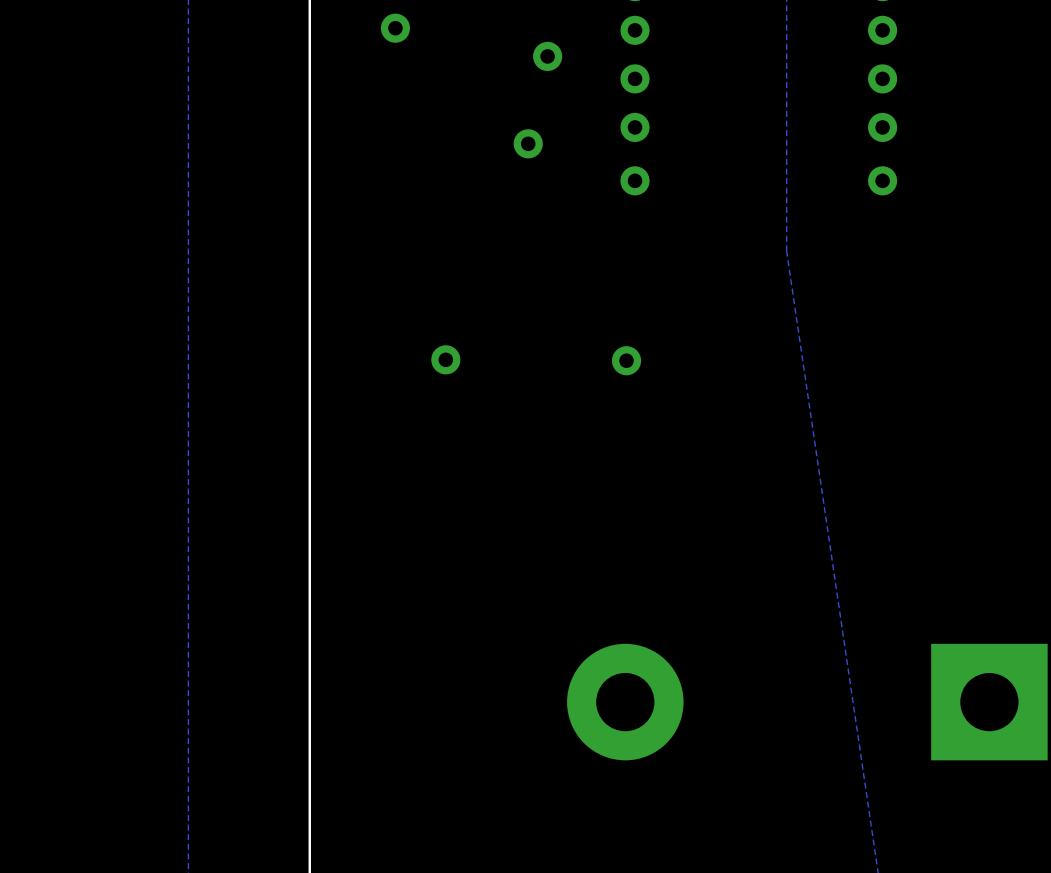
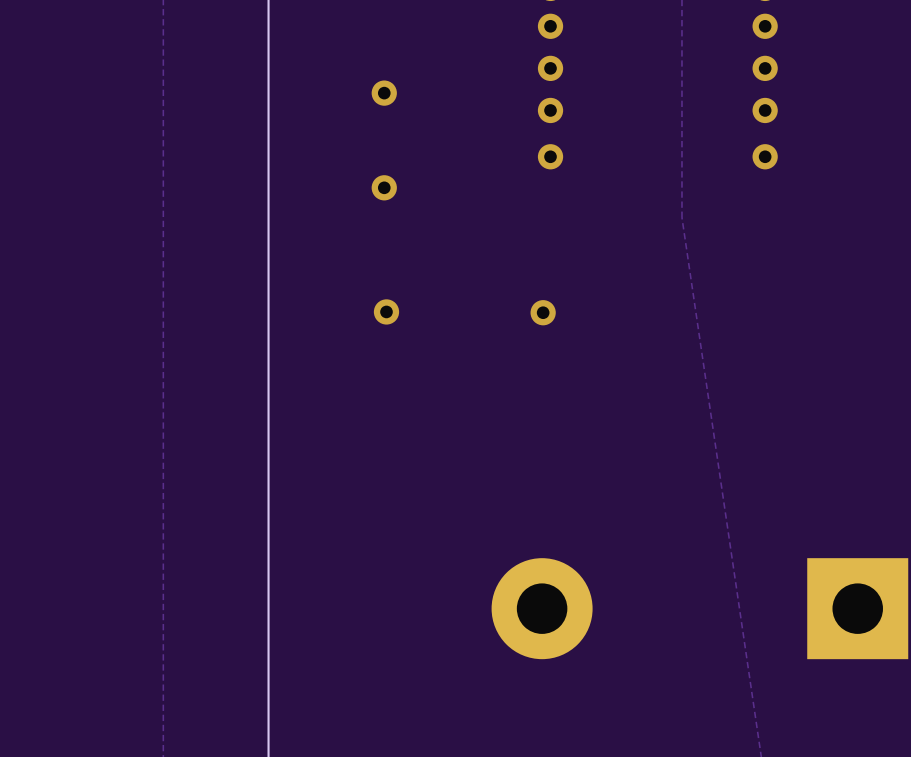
via: (395, 28) -> none
via: (547, 56) -> none
via: none -> (384, 93)
via: (528, 143) -> none
via: none -> (384, 187)

